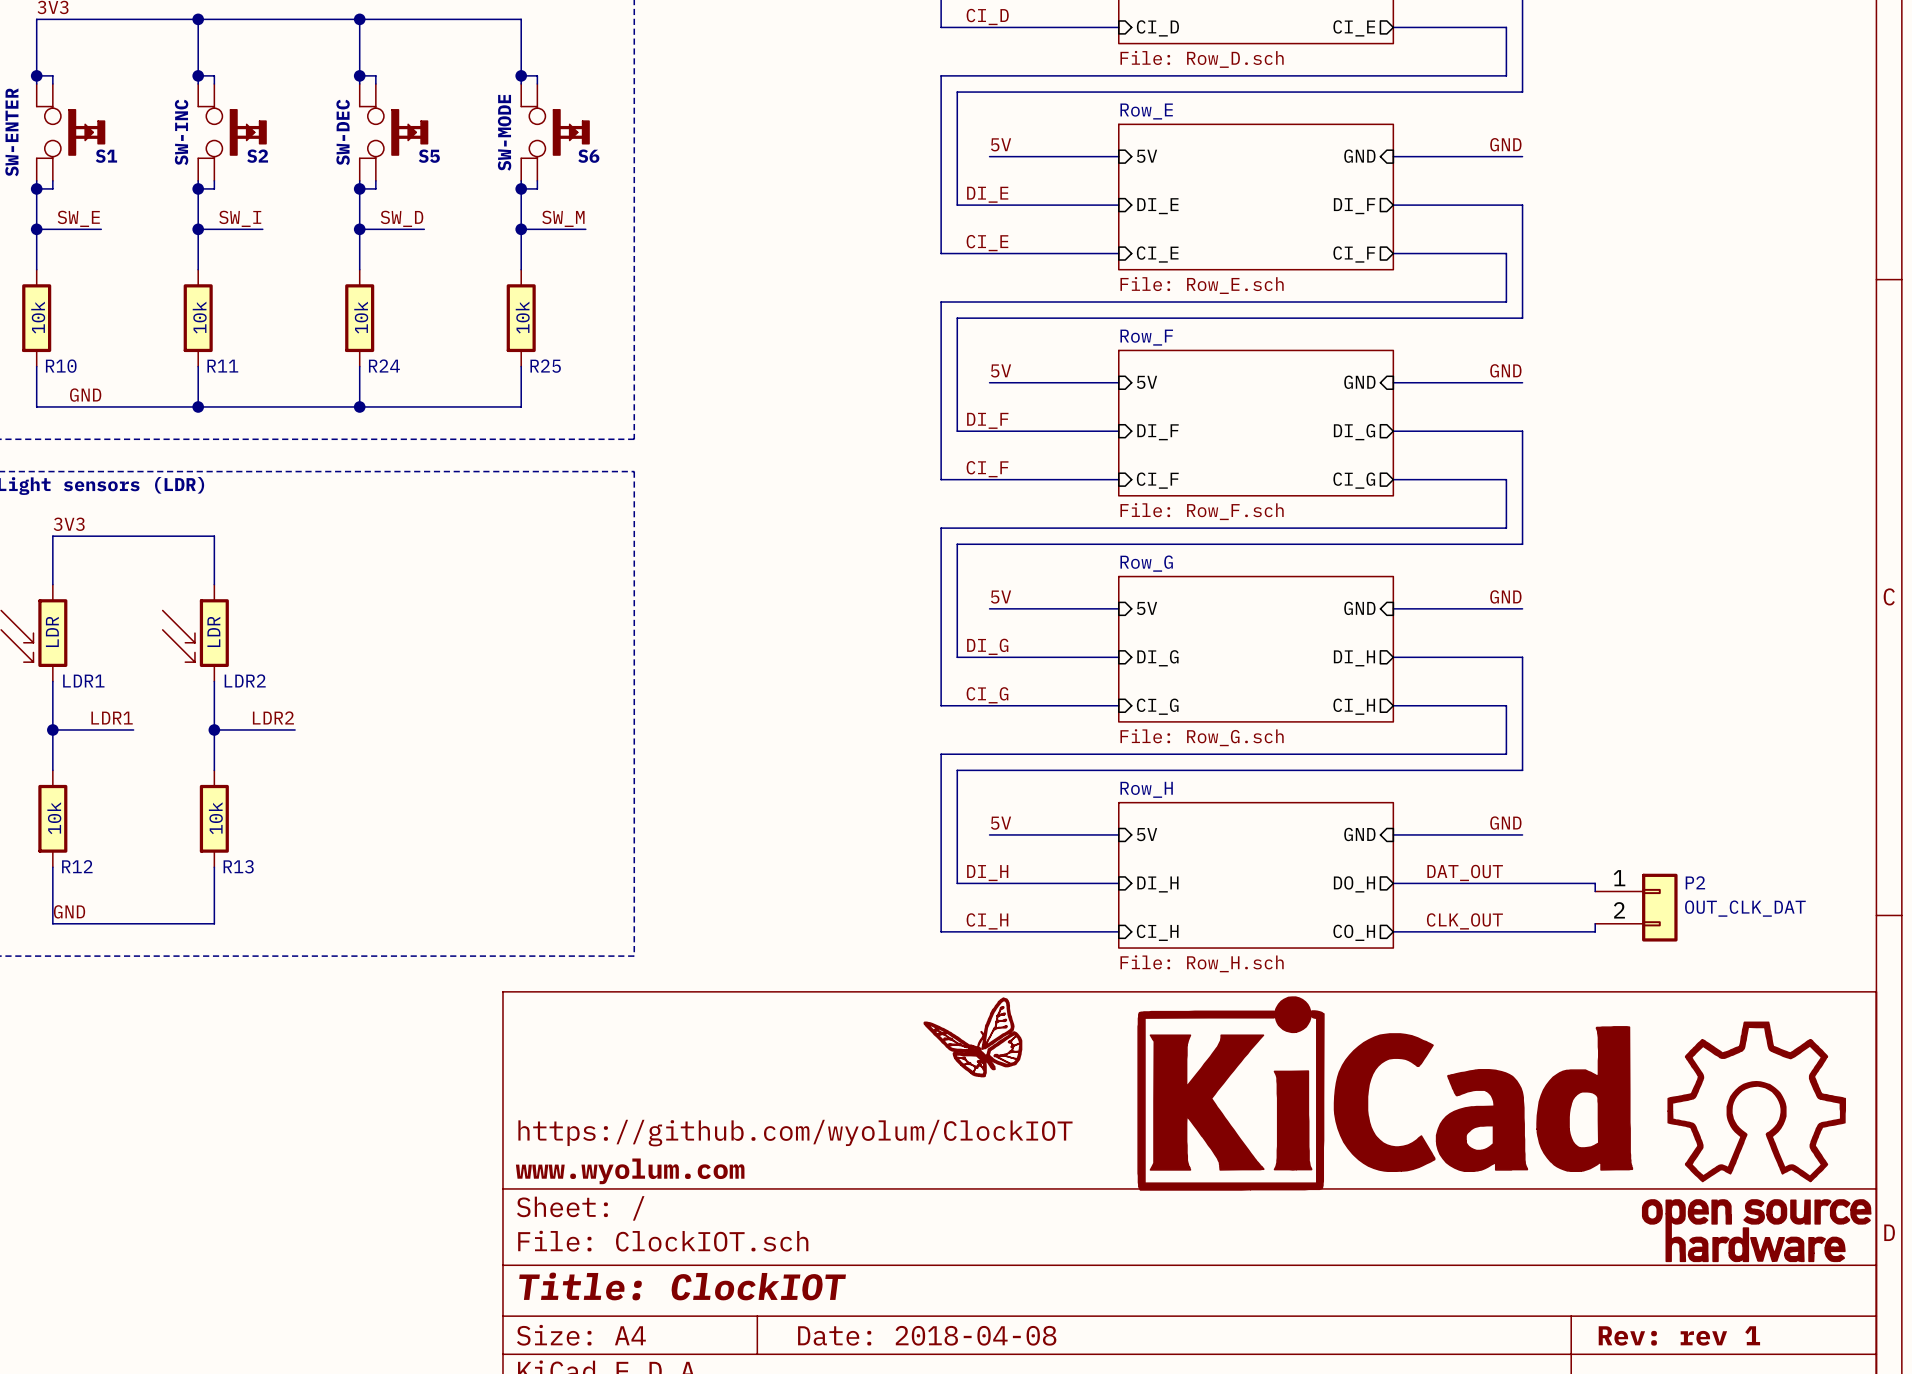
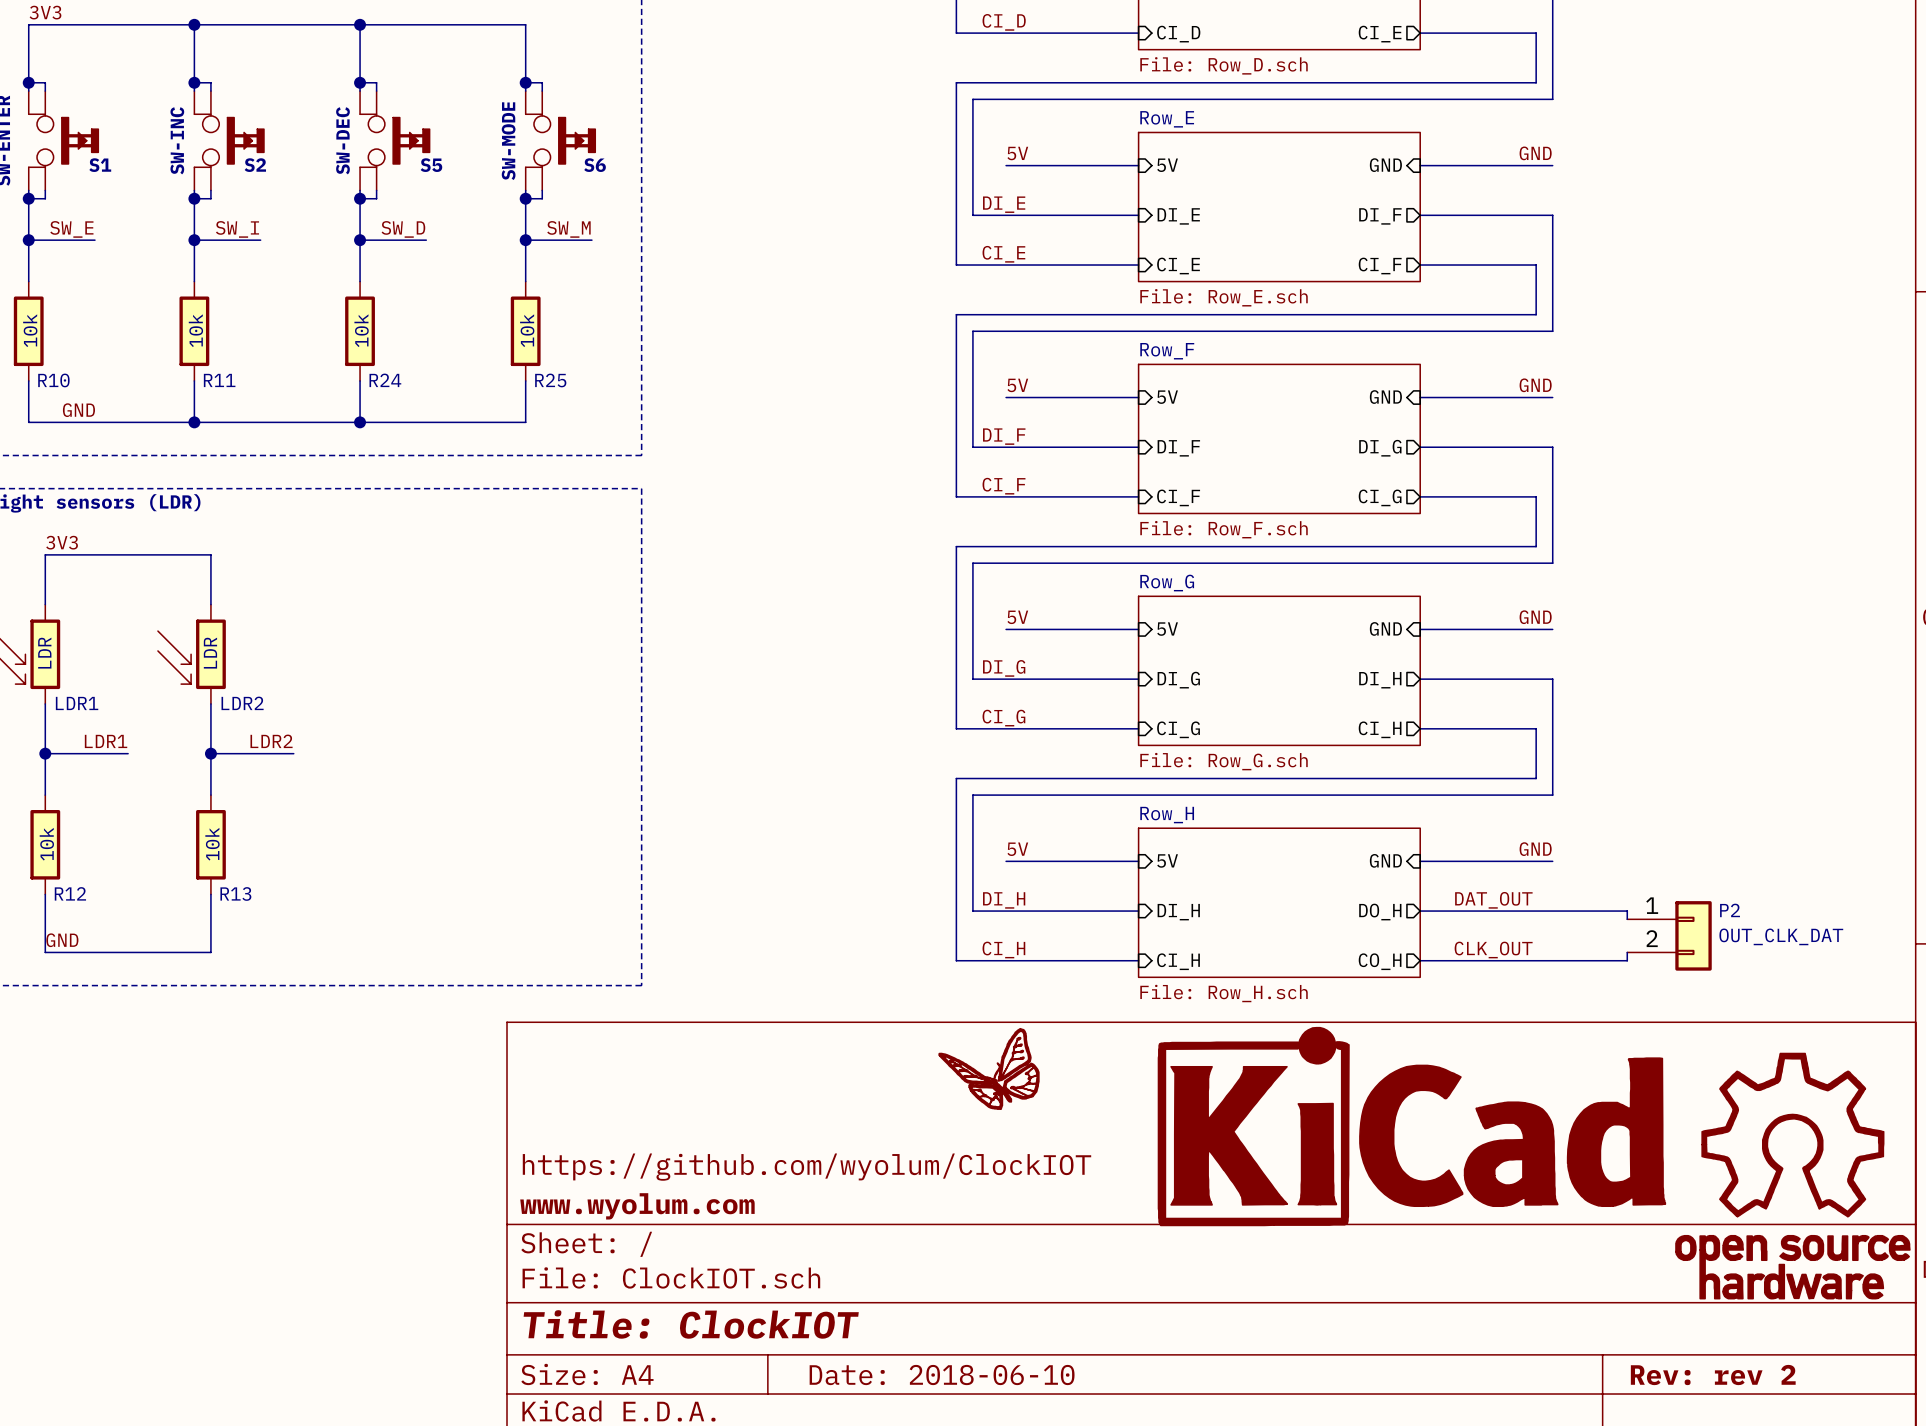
title block: Date: 2018-04-08 (927, 1335) -> Date: 2018-06-10 (942, 1375)
title block: Rev: rev 1 (1679, 1335) -> Rev: rev 2 (1713, 1375)

